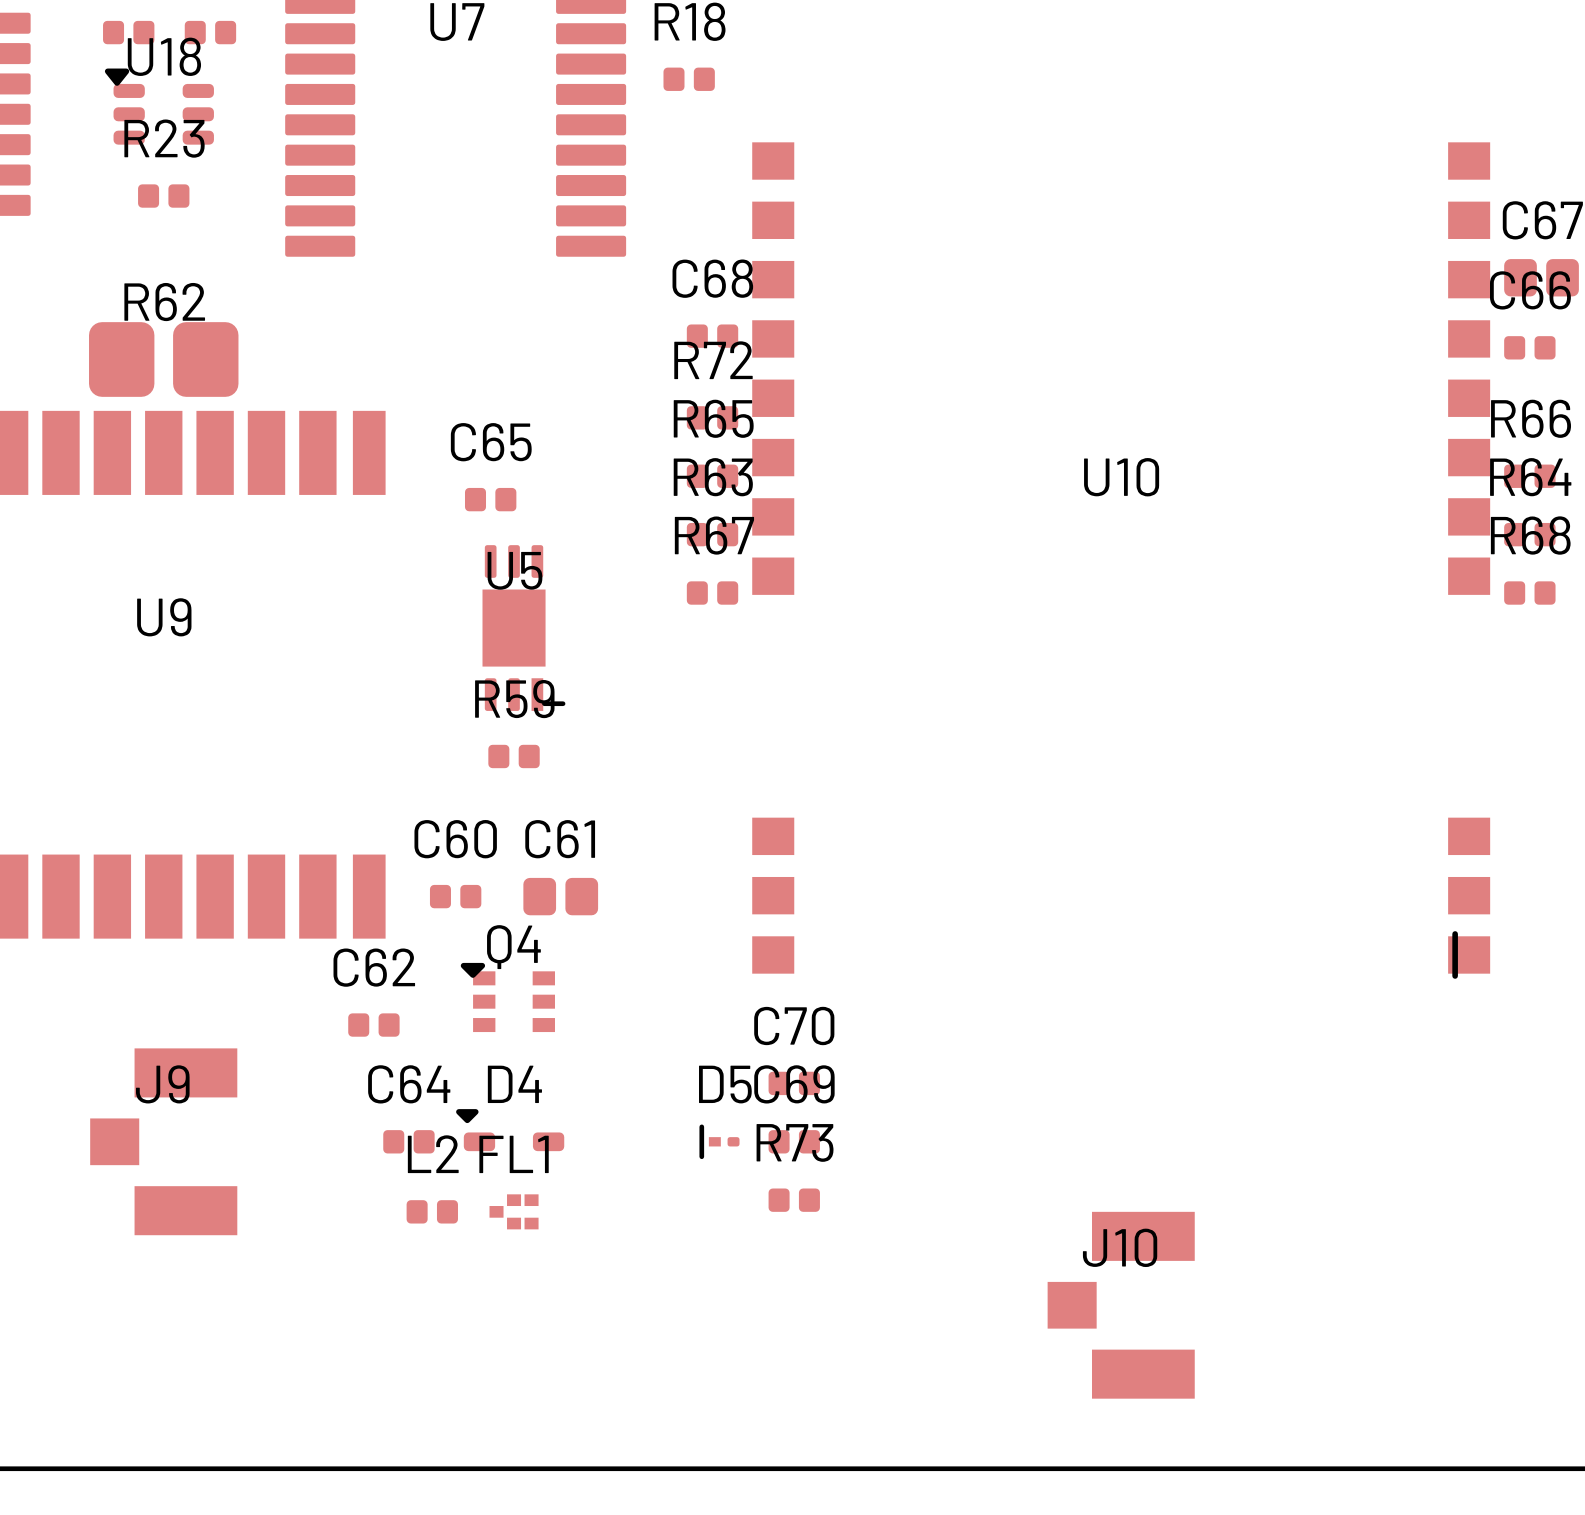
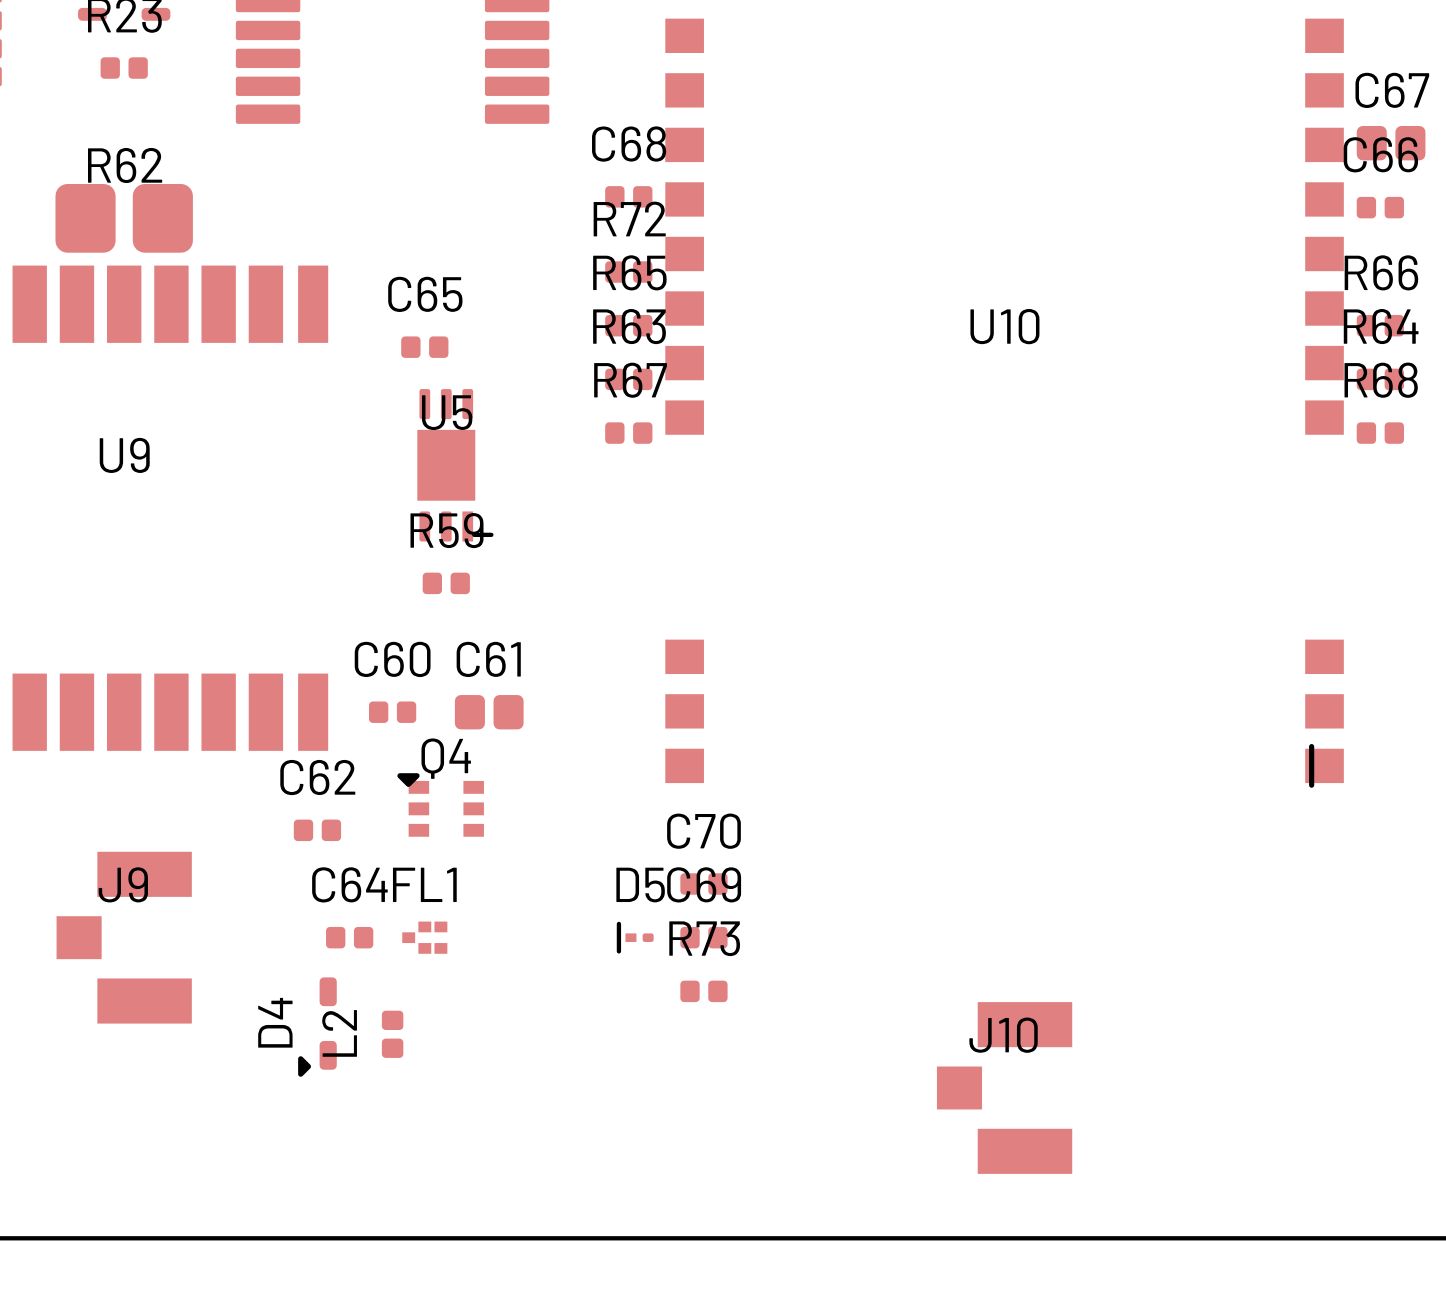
D4 rotation: 0° (510, 1130) -> 90° counterclockwise (317, 1027)
D4 position: (510, 1130) -> (317, 1027)
L2 rotation: 0° (432, 1211) -> 90° clockwise (392, 1034)
L2 position: (432, 1211) -> (392, 1034)
FL1 position: (514, 1211) -> (424, 937)

